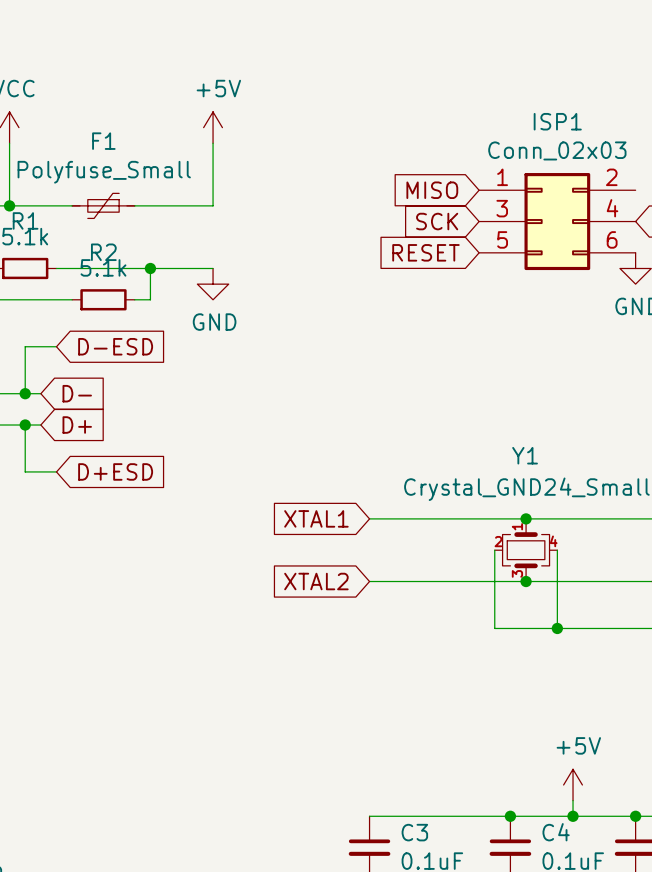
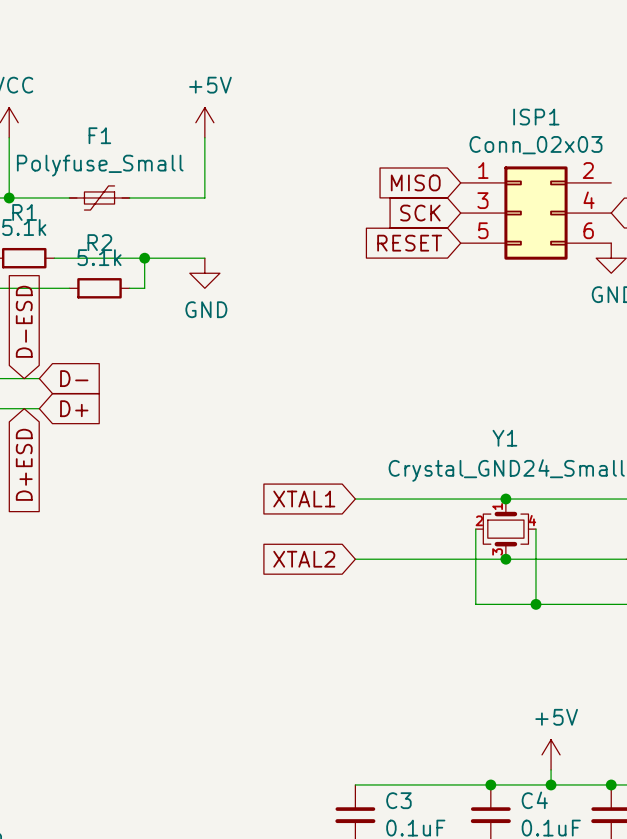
wire: (56, 346) (25, 346) (25, 393) -> none
global label rotation: 0° (115, 346) -> 90° counterclockwise (24, 321)
junction: (25, 393) -> none
wire: (25, 425) (25, 471) (56, 471) -> none
junction: (25, 425) -> none
global label rotation: 0° (115, 471) -> 90° clockwise (24, 464)

